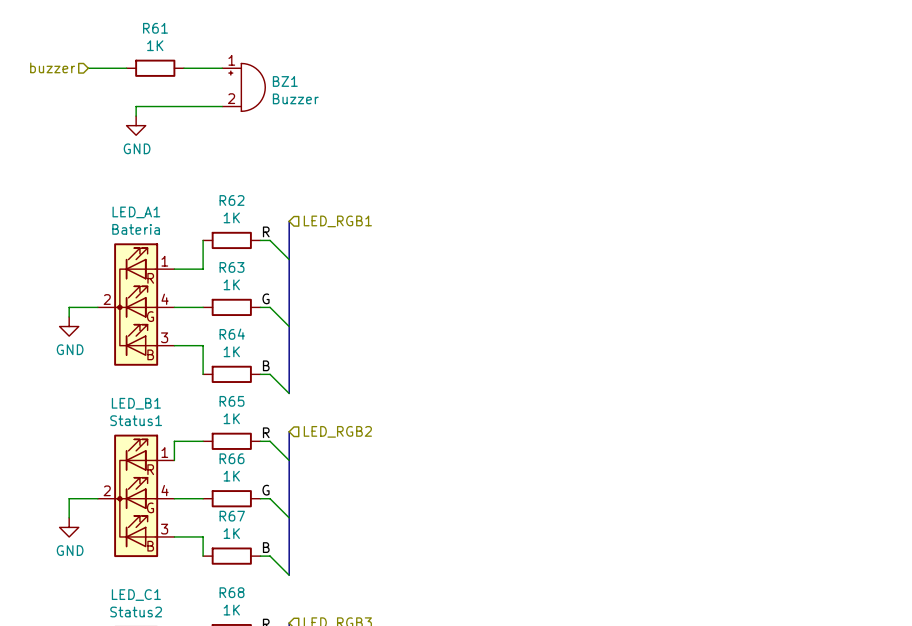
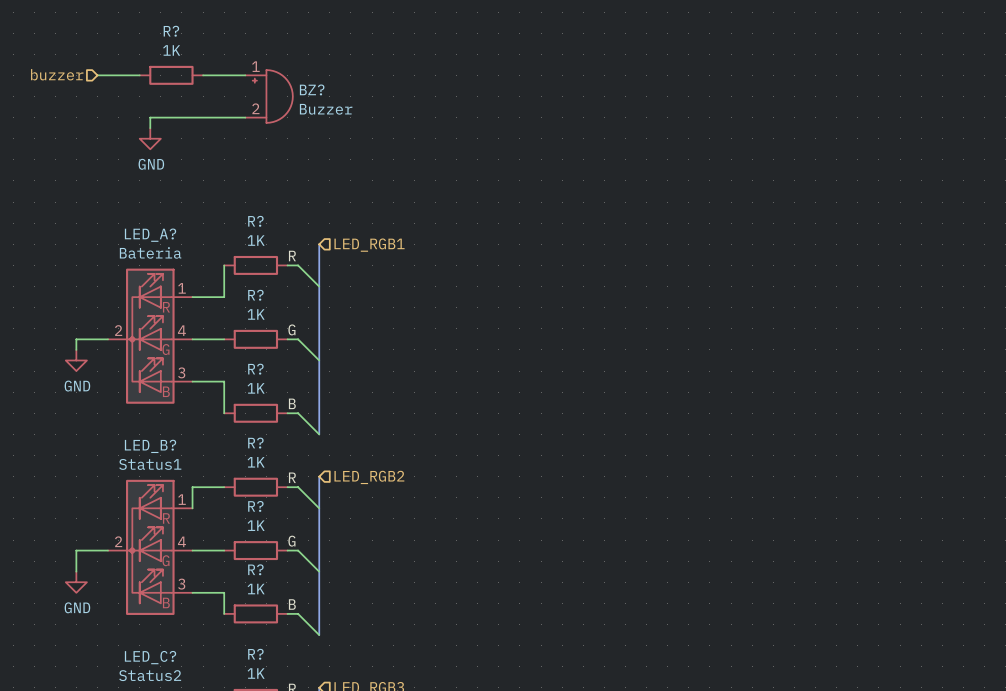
R61 name: R61 (155, 28) -> R? (171, 31)
BZ1 name: BZ1 (285, 81) -> BZ? (312, 89)
R62 name: R62 (232, 200) -> R? (255, 221)
LED_A1 name: LED_A1 (136, 212) -> LED_A? (150, 235)
R63 name: R63 (232, 267) -> R? (255, 295)
R64 name: R64 (232, 334) -> R? (255, 369)
R65 name: R65 (232, 401) -> R? (255, 443)
LED_B1 name: LED_B1 (136, 403) -> LED_B? (150, 446)
R66 name: R66 (232, 458) -> R? (255, 506)
R67 name: R67 (232, 516) -> R? (255, 569)
R68 name: R68 (232, 592) -> R? (255, 654)
LED_C1 name: LED_C1 (136, 595) -> LED_C? (150, 657)

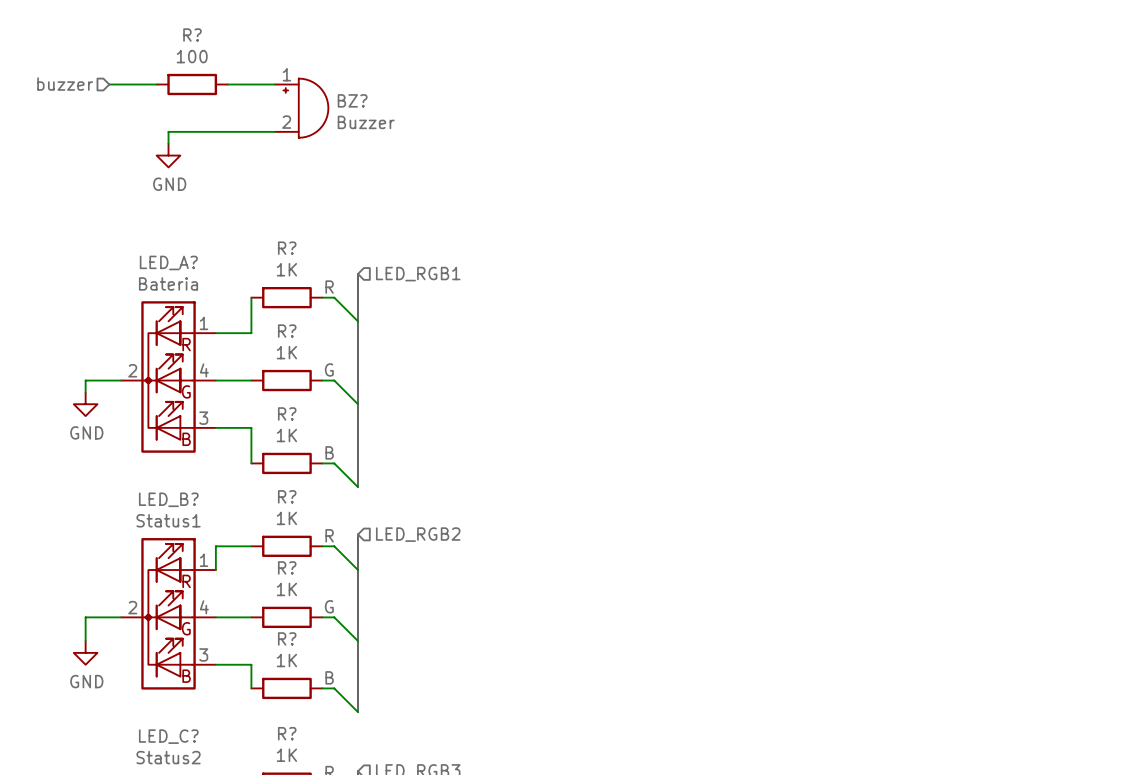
R? value: 1K (171, 50) -> 100 (192, 56)

